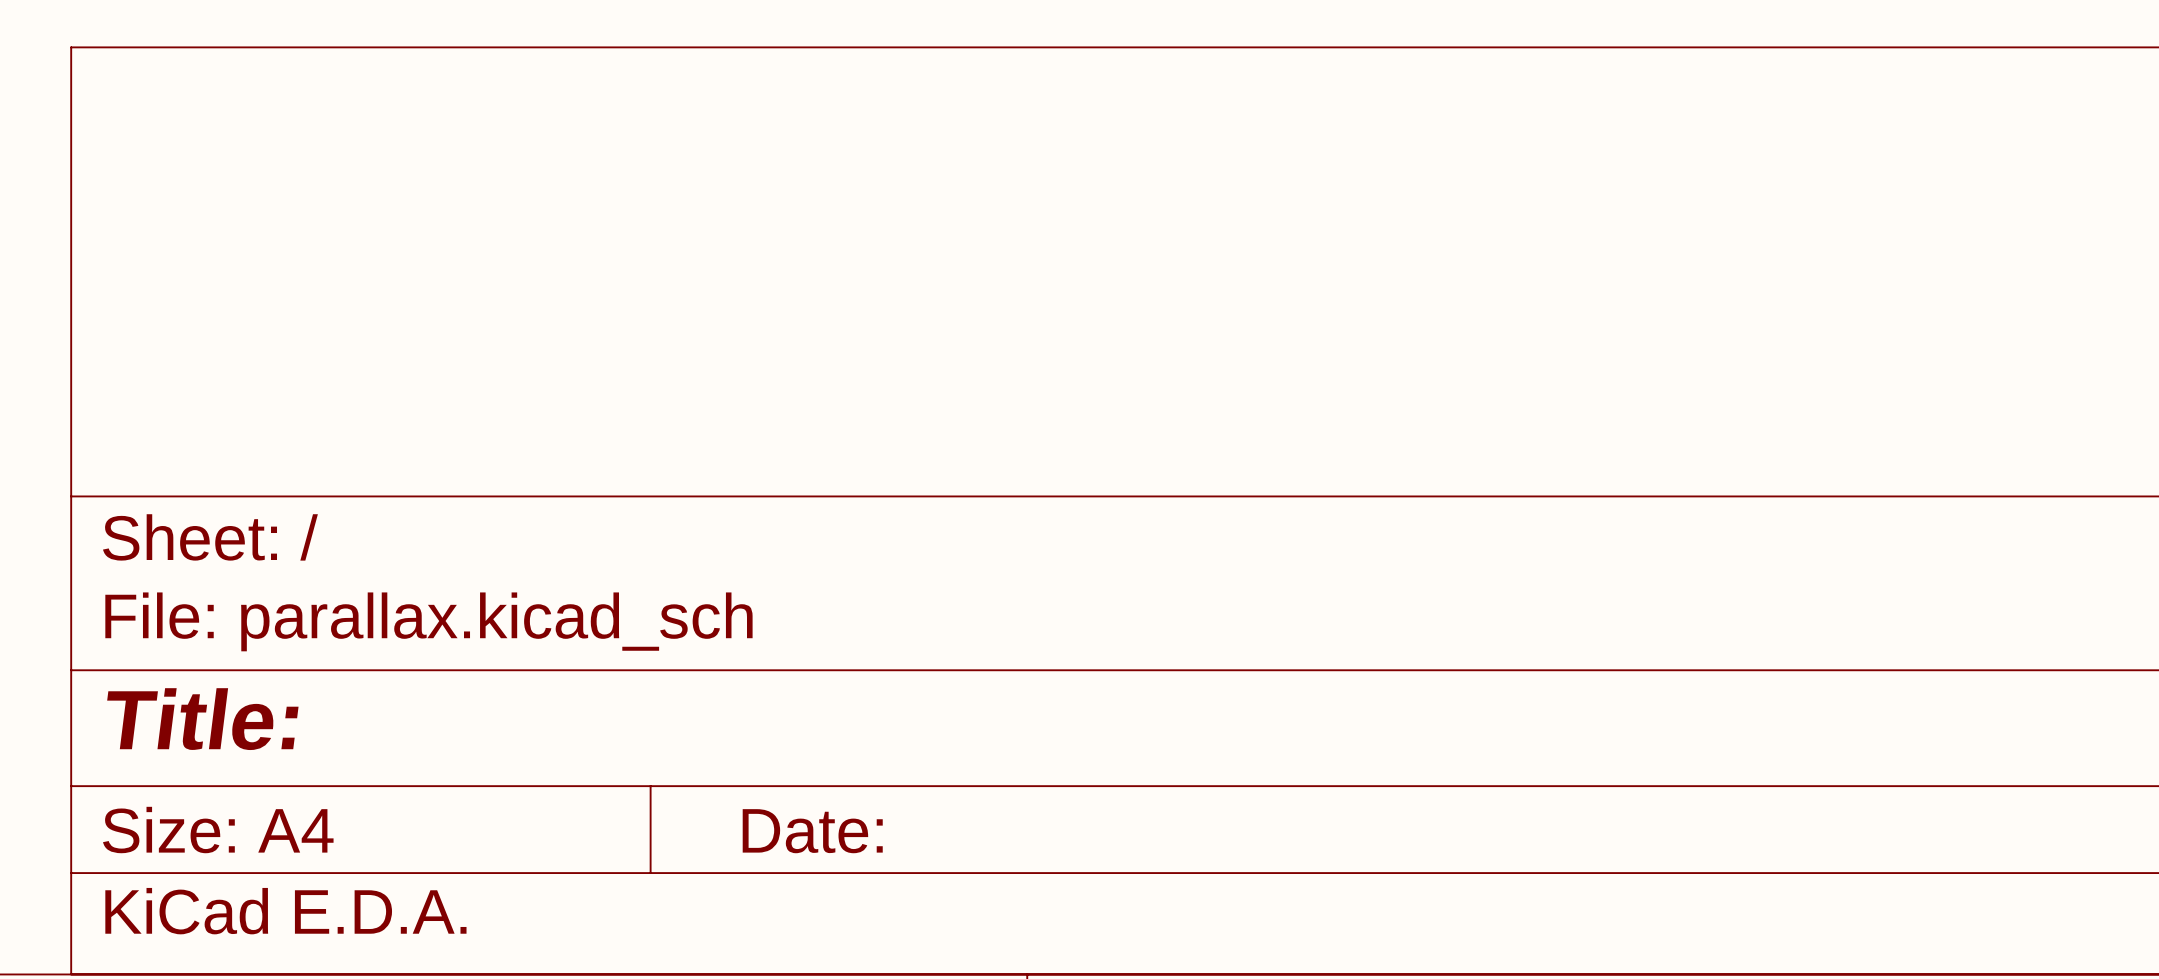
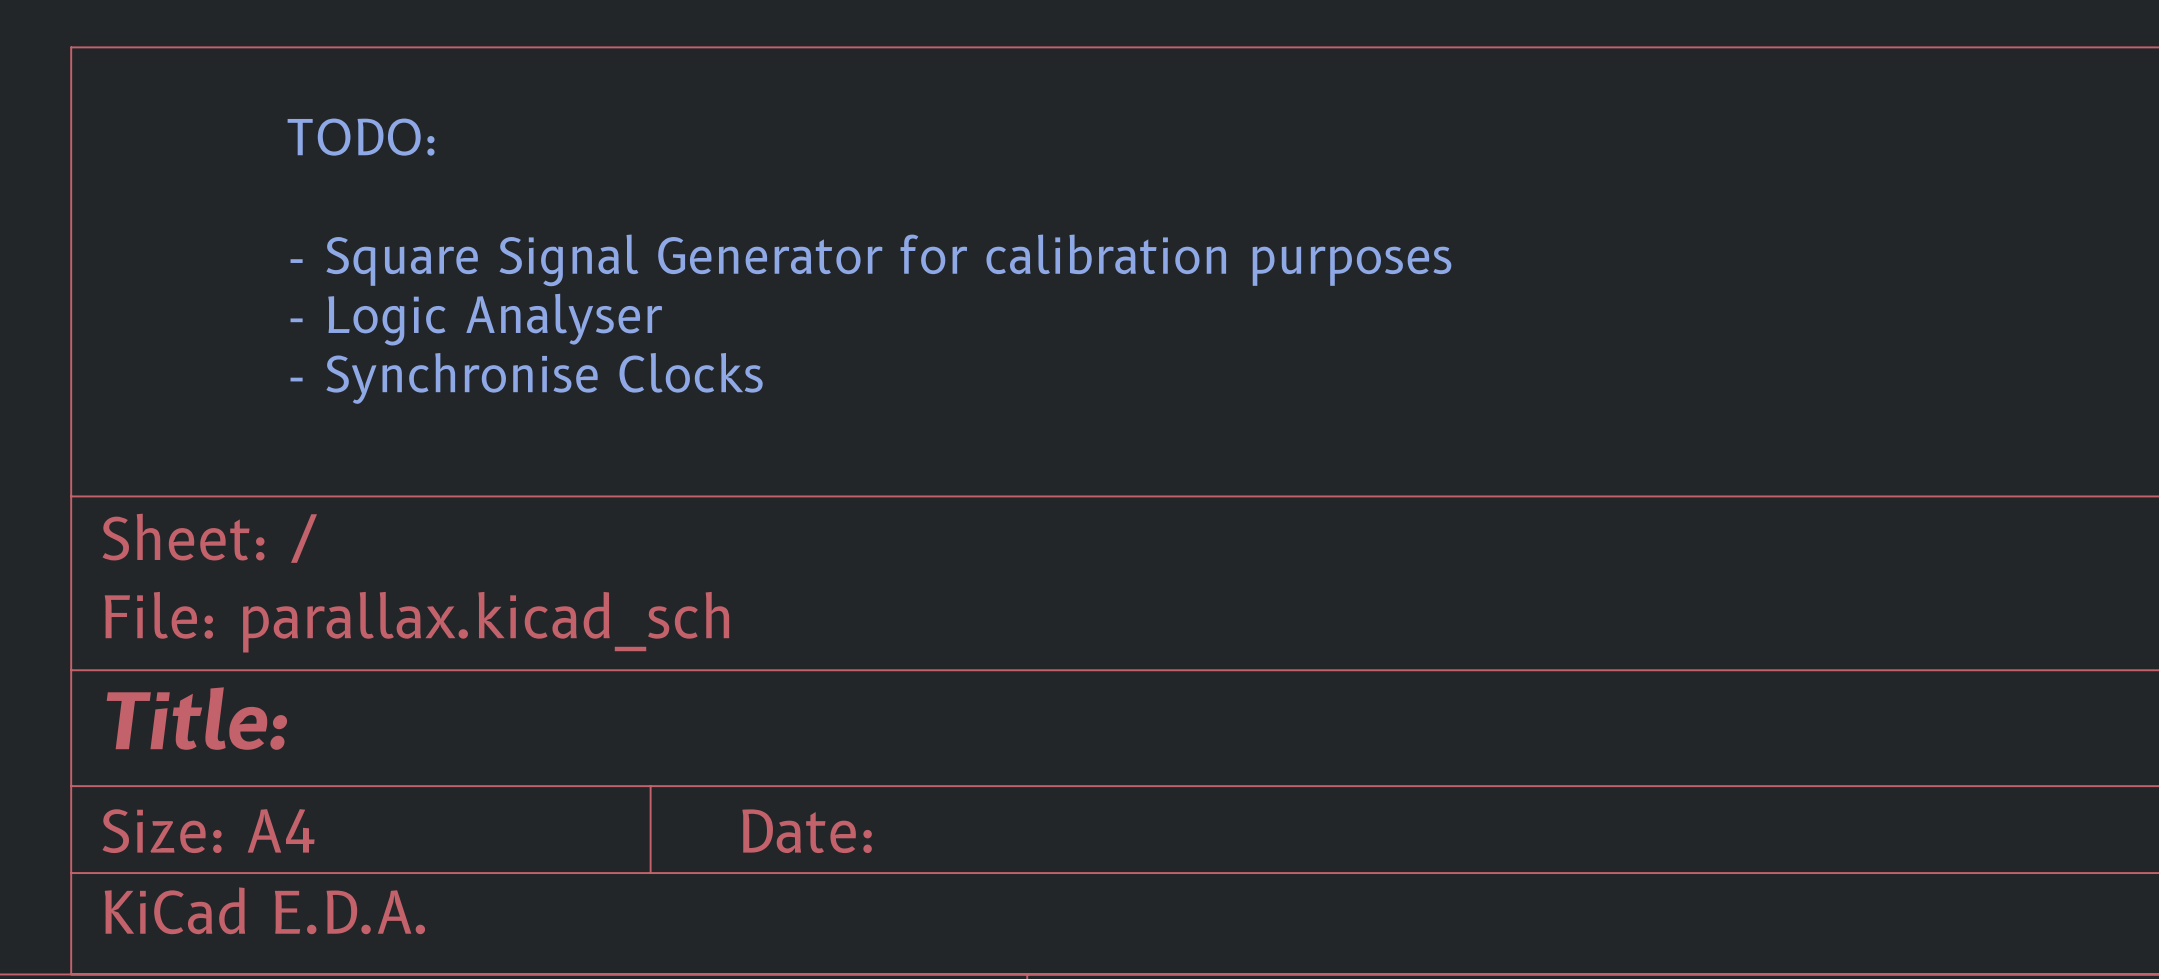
text: none -> TODO: (361, 137)
text: none -> - Square Signal Generator for calibration purposes (870, 260)
text: none -> - Logic Analyser (476, 319)
text: none -> - Synchronise Clocks (526, 378)

